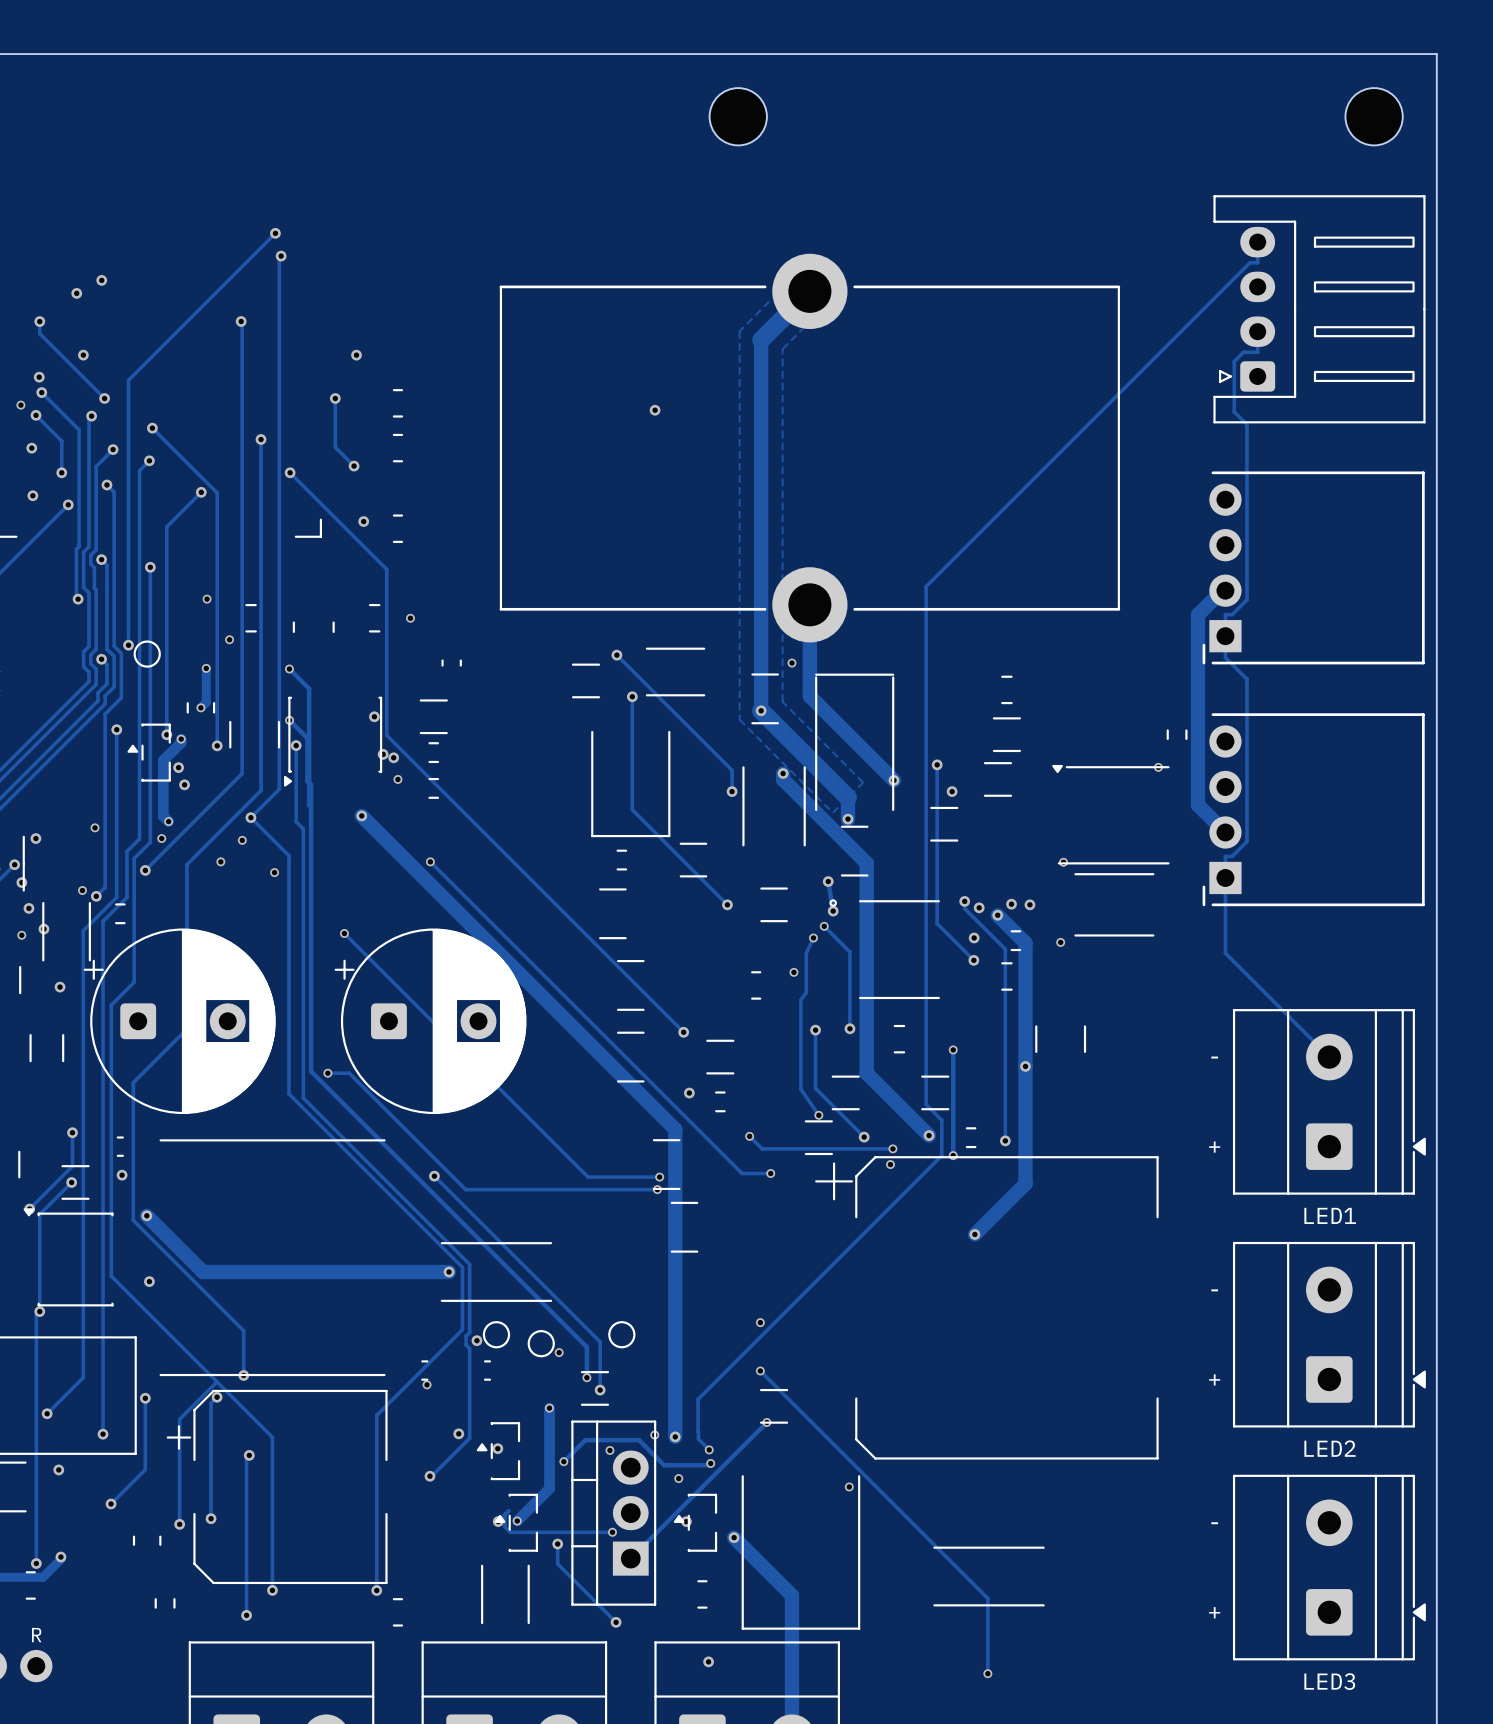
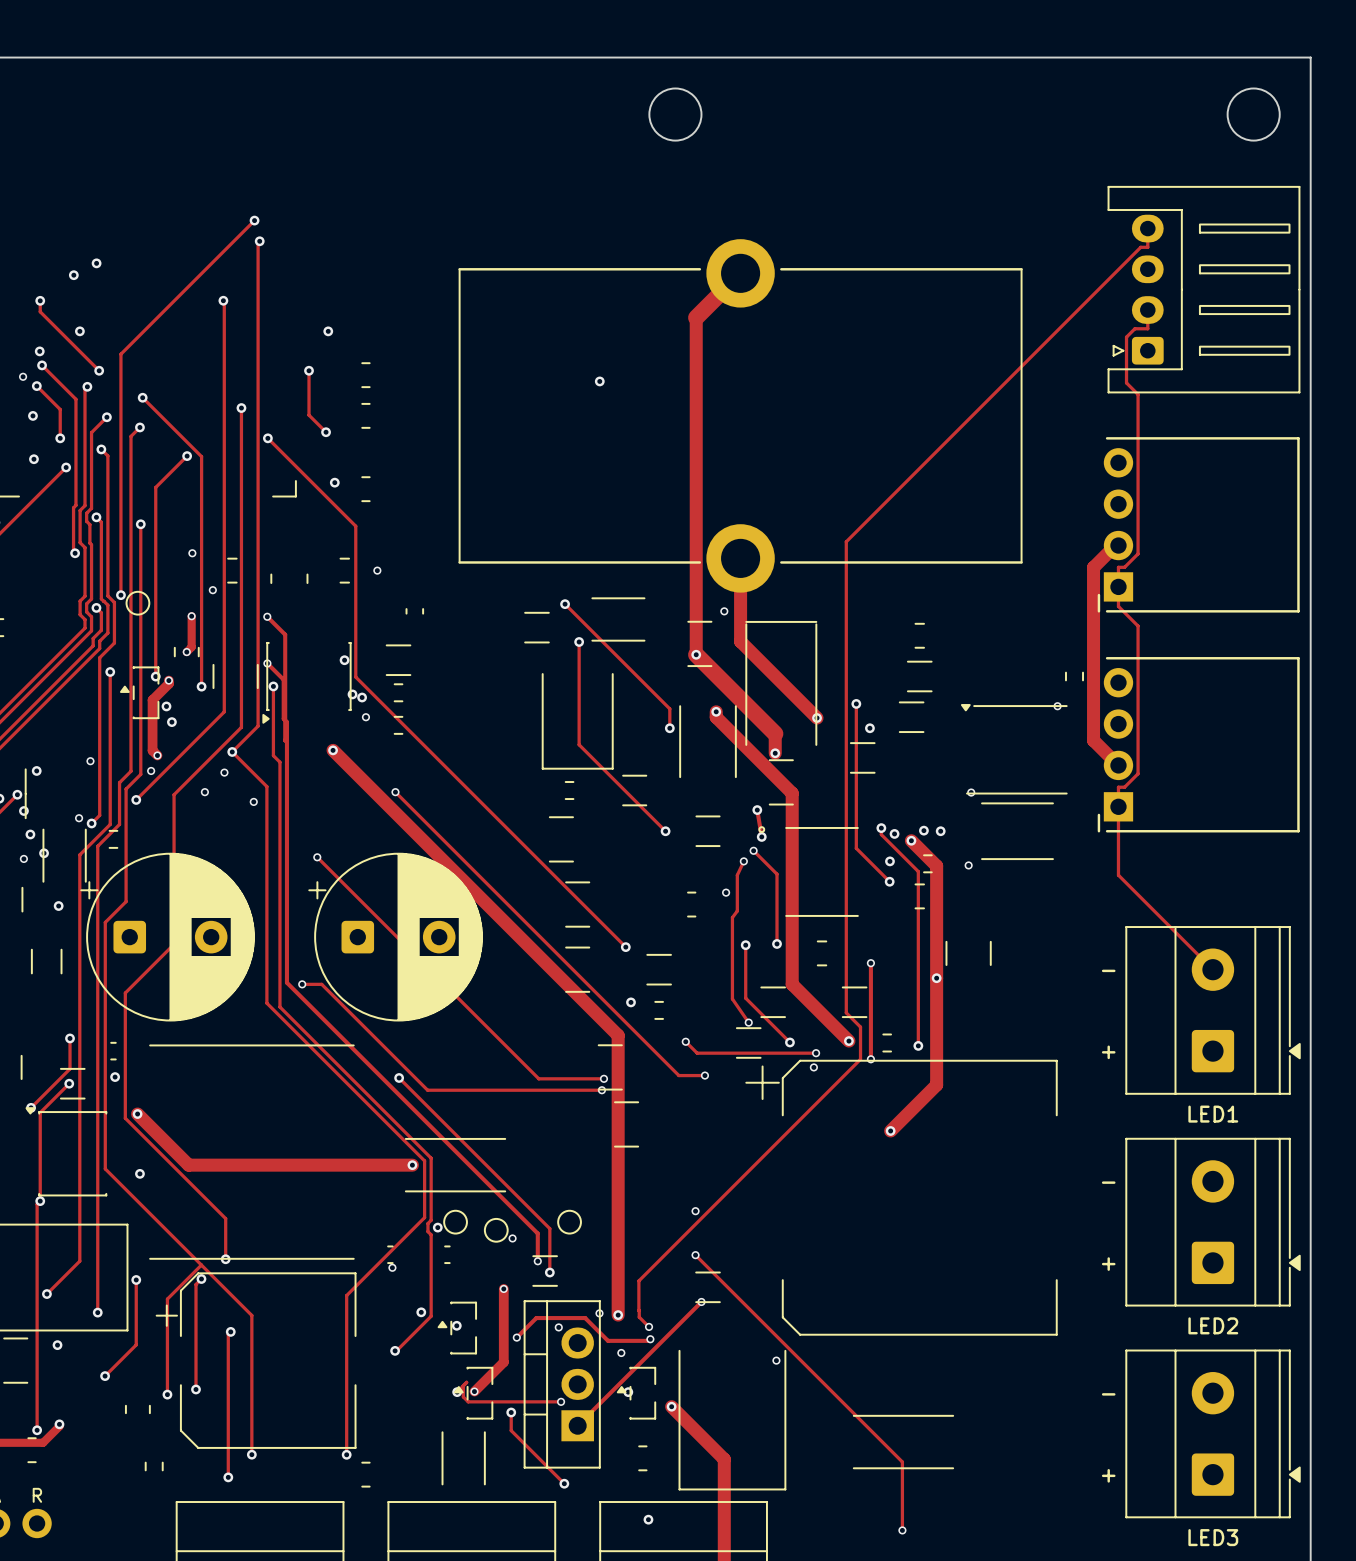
zone outline: (794, 276) (739, 331) (739, 719) (832, 812) (863, 782) (782, 701) (782, 349) (825, 306) (794, 276) -> none

